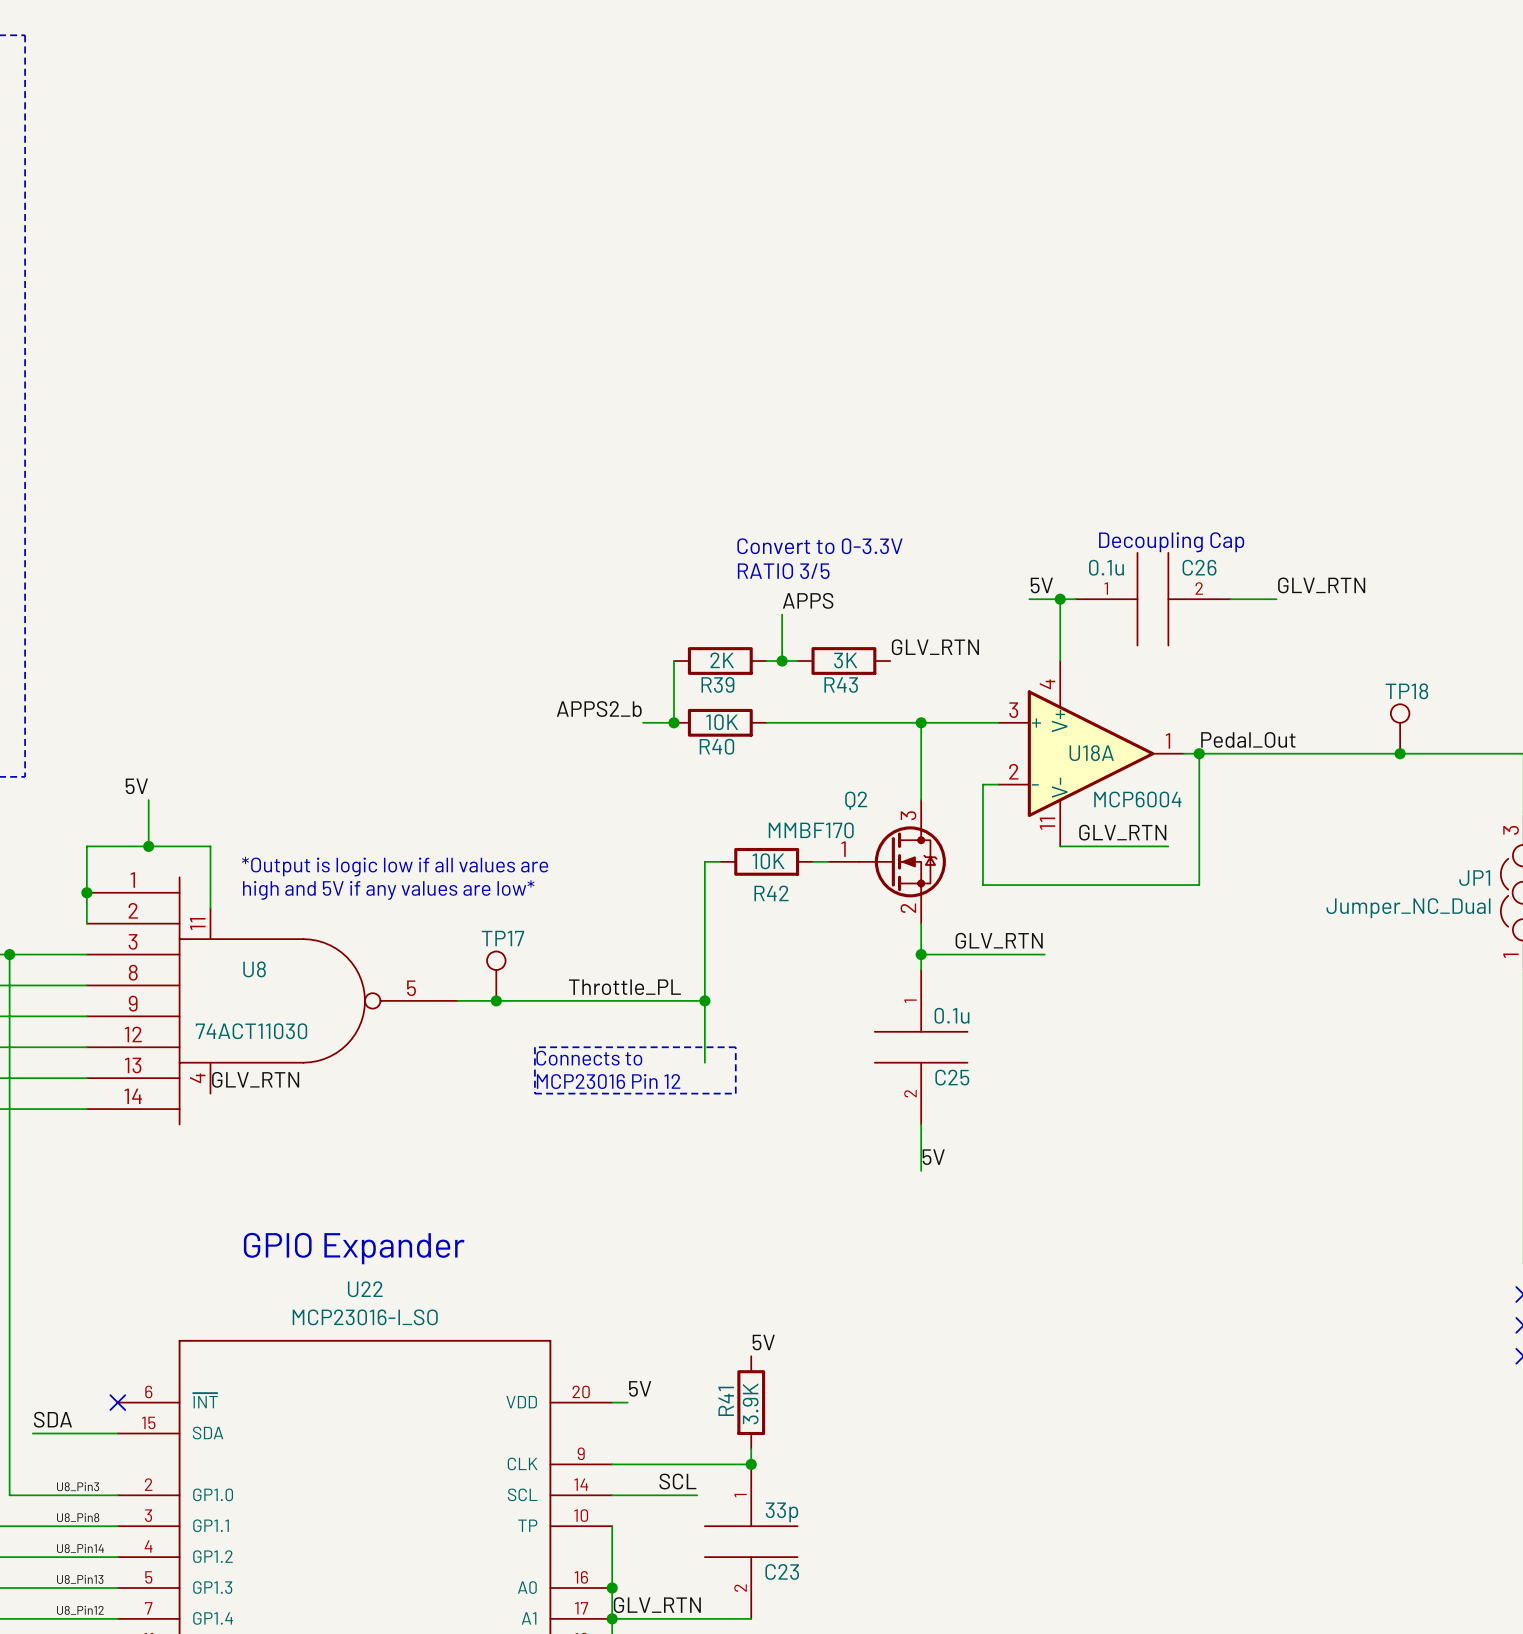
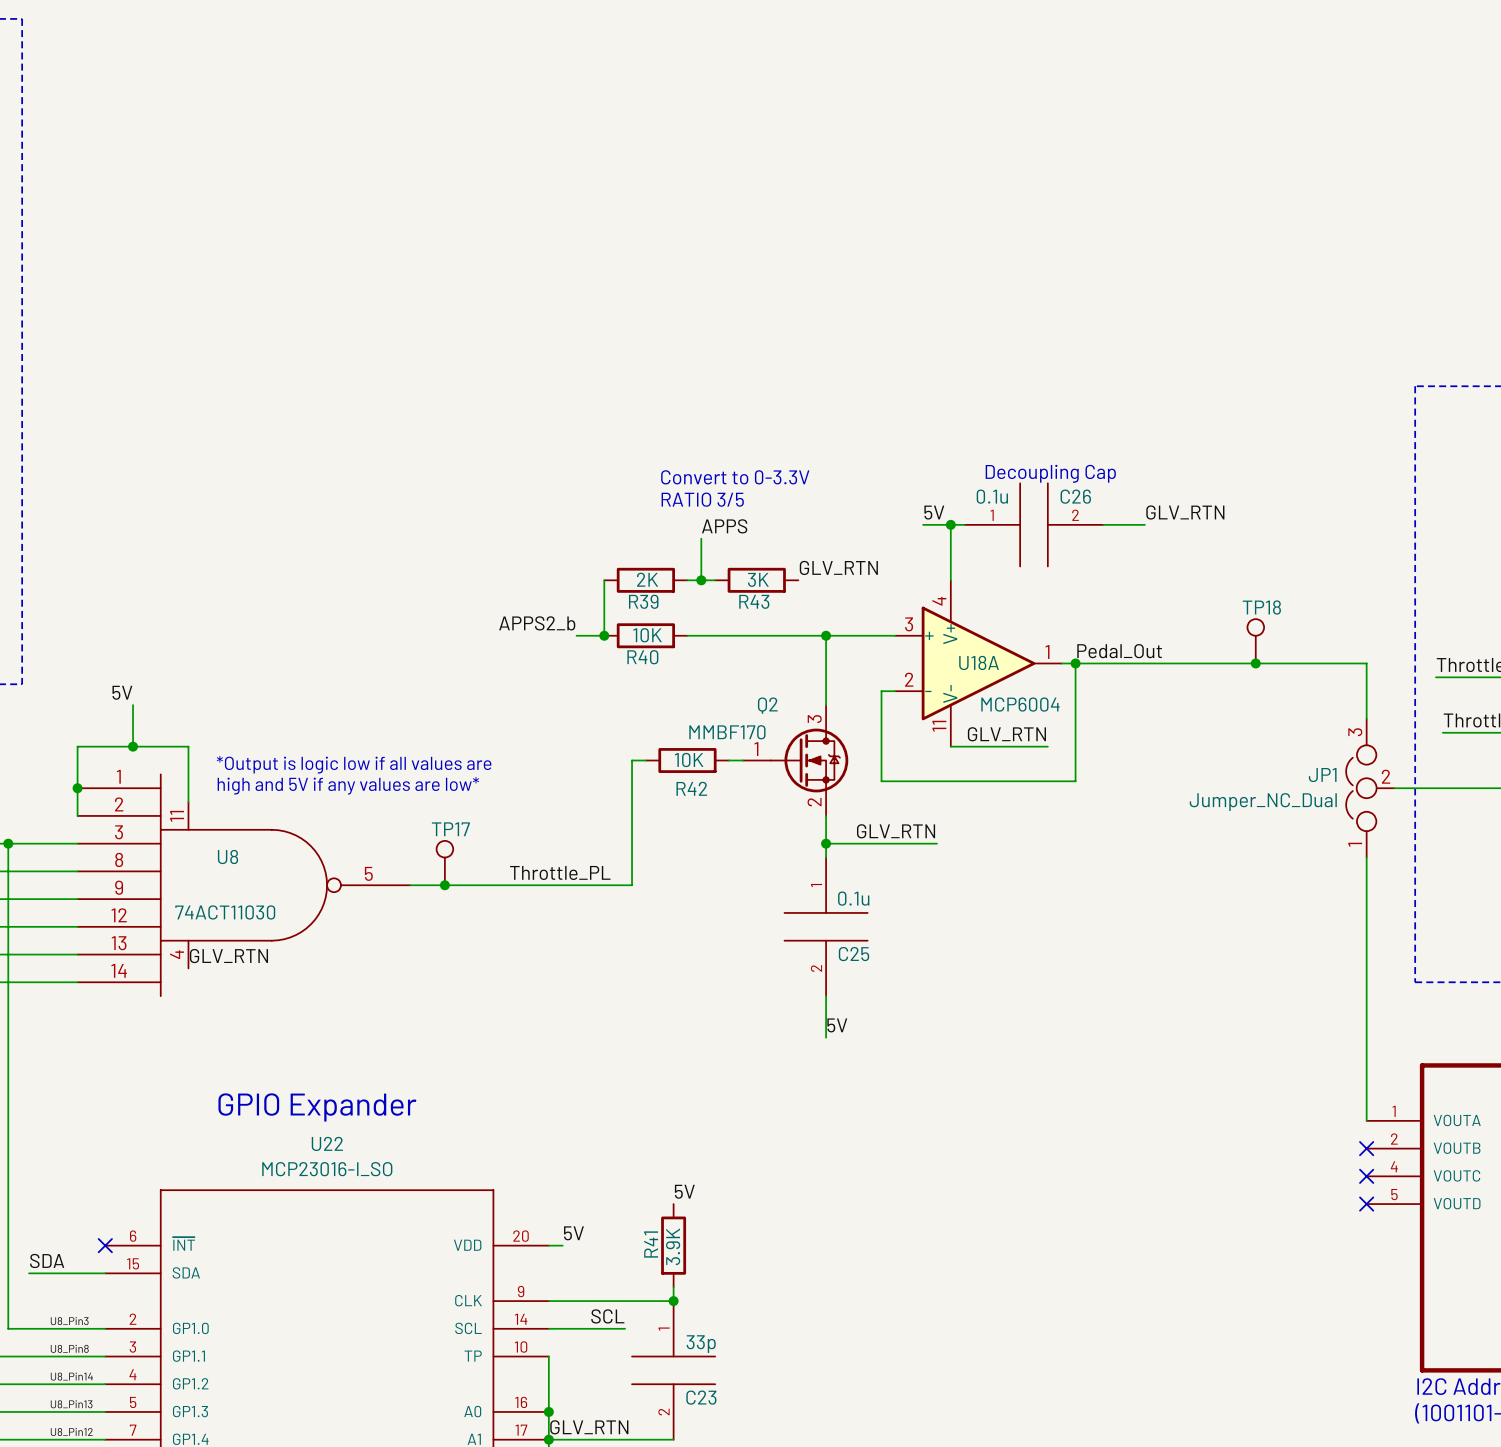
wire: (704, 1000) (704, 1062) -> none
junction: (704, 1000) -> none
line: (534, 1047) (534, 1093) (735, 1093) (735, 1047) (534, 1047) -> none
text: Connects to (589, 1058) -> none
text: MCP23016 Pin 12 (608, 1081) -> none

